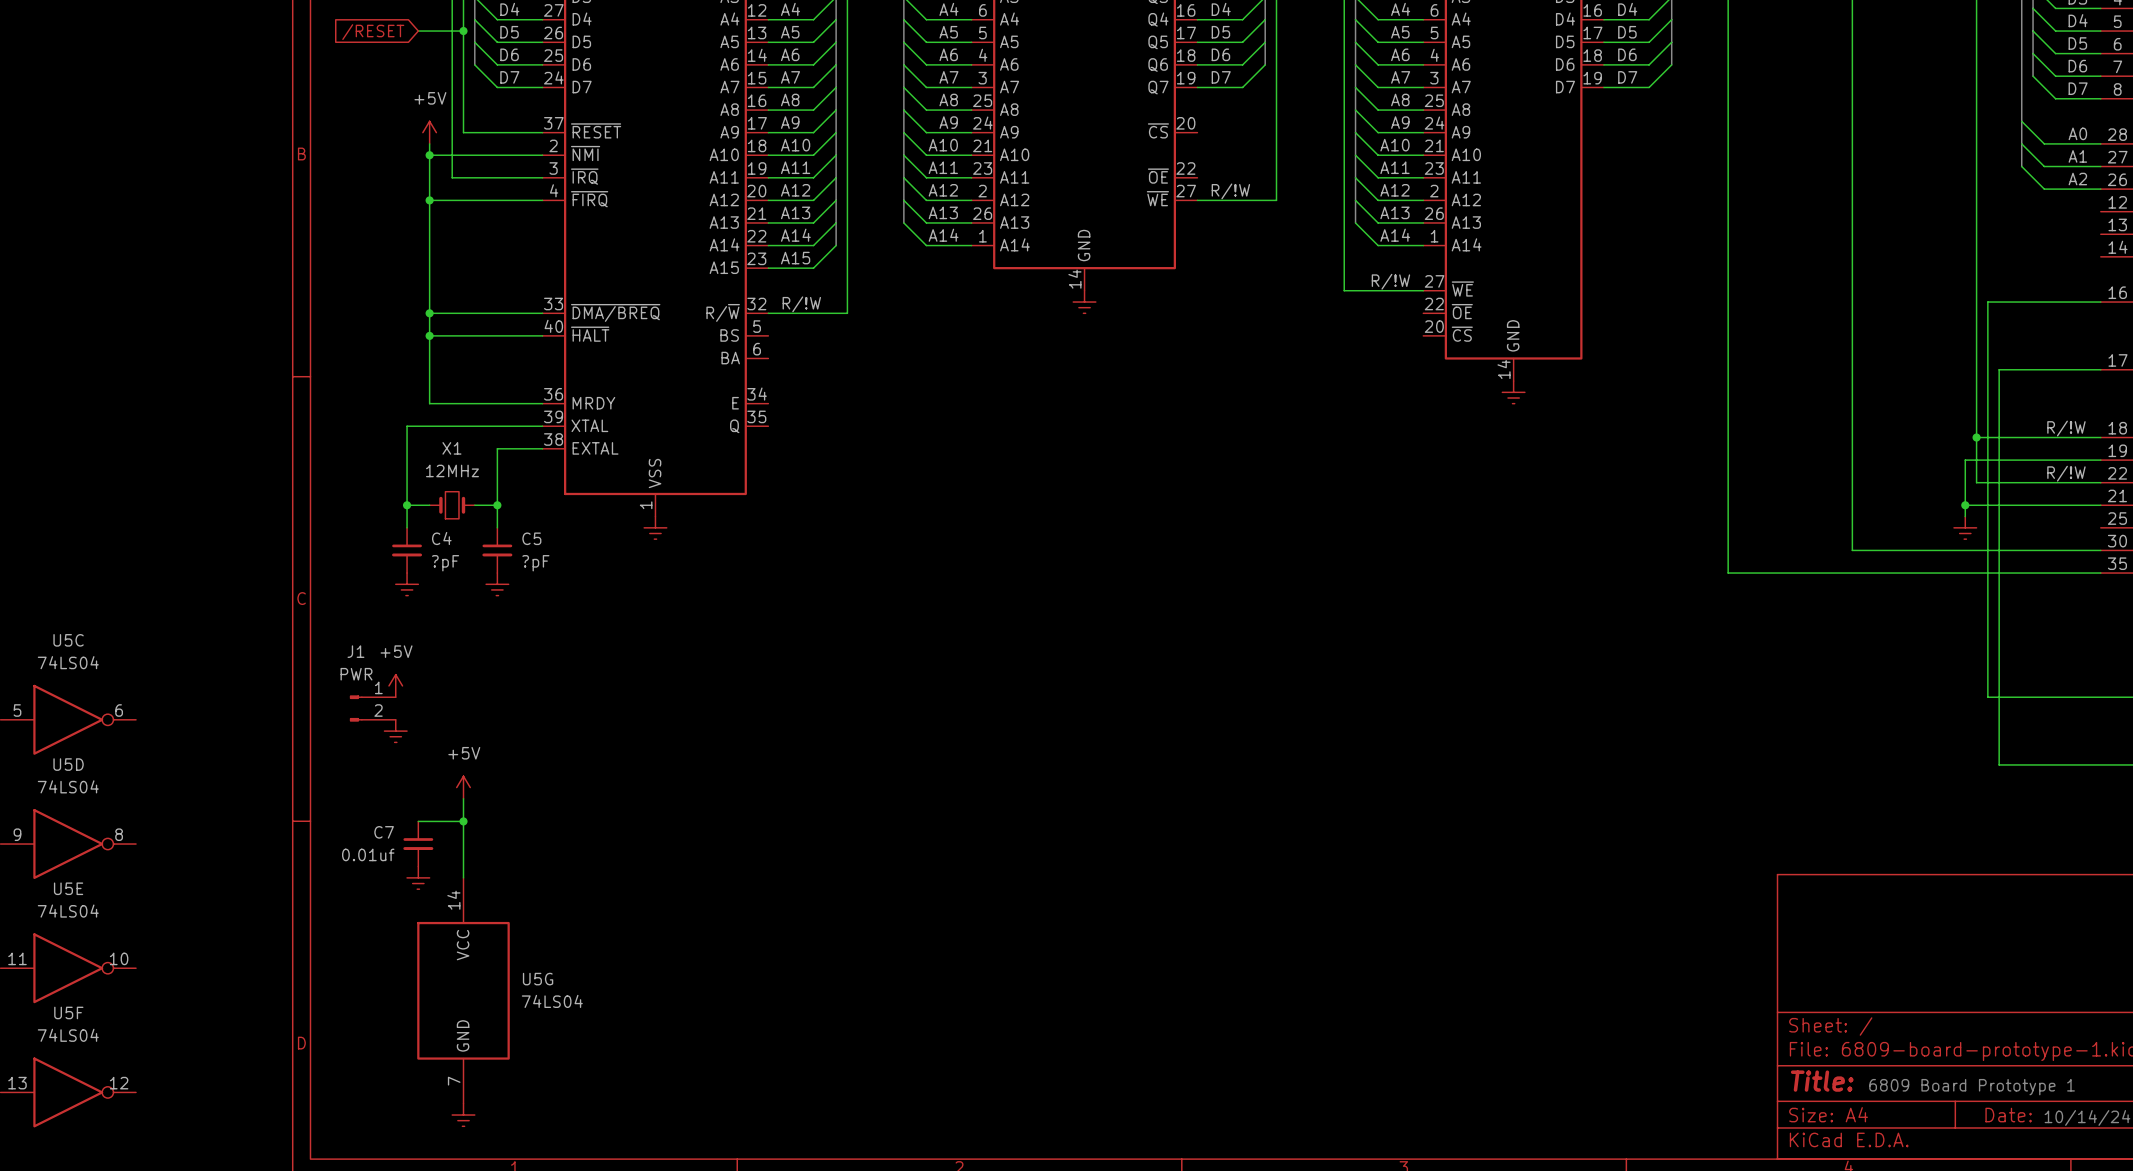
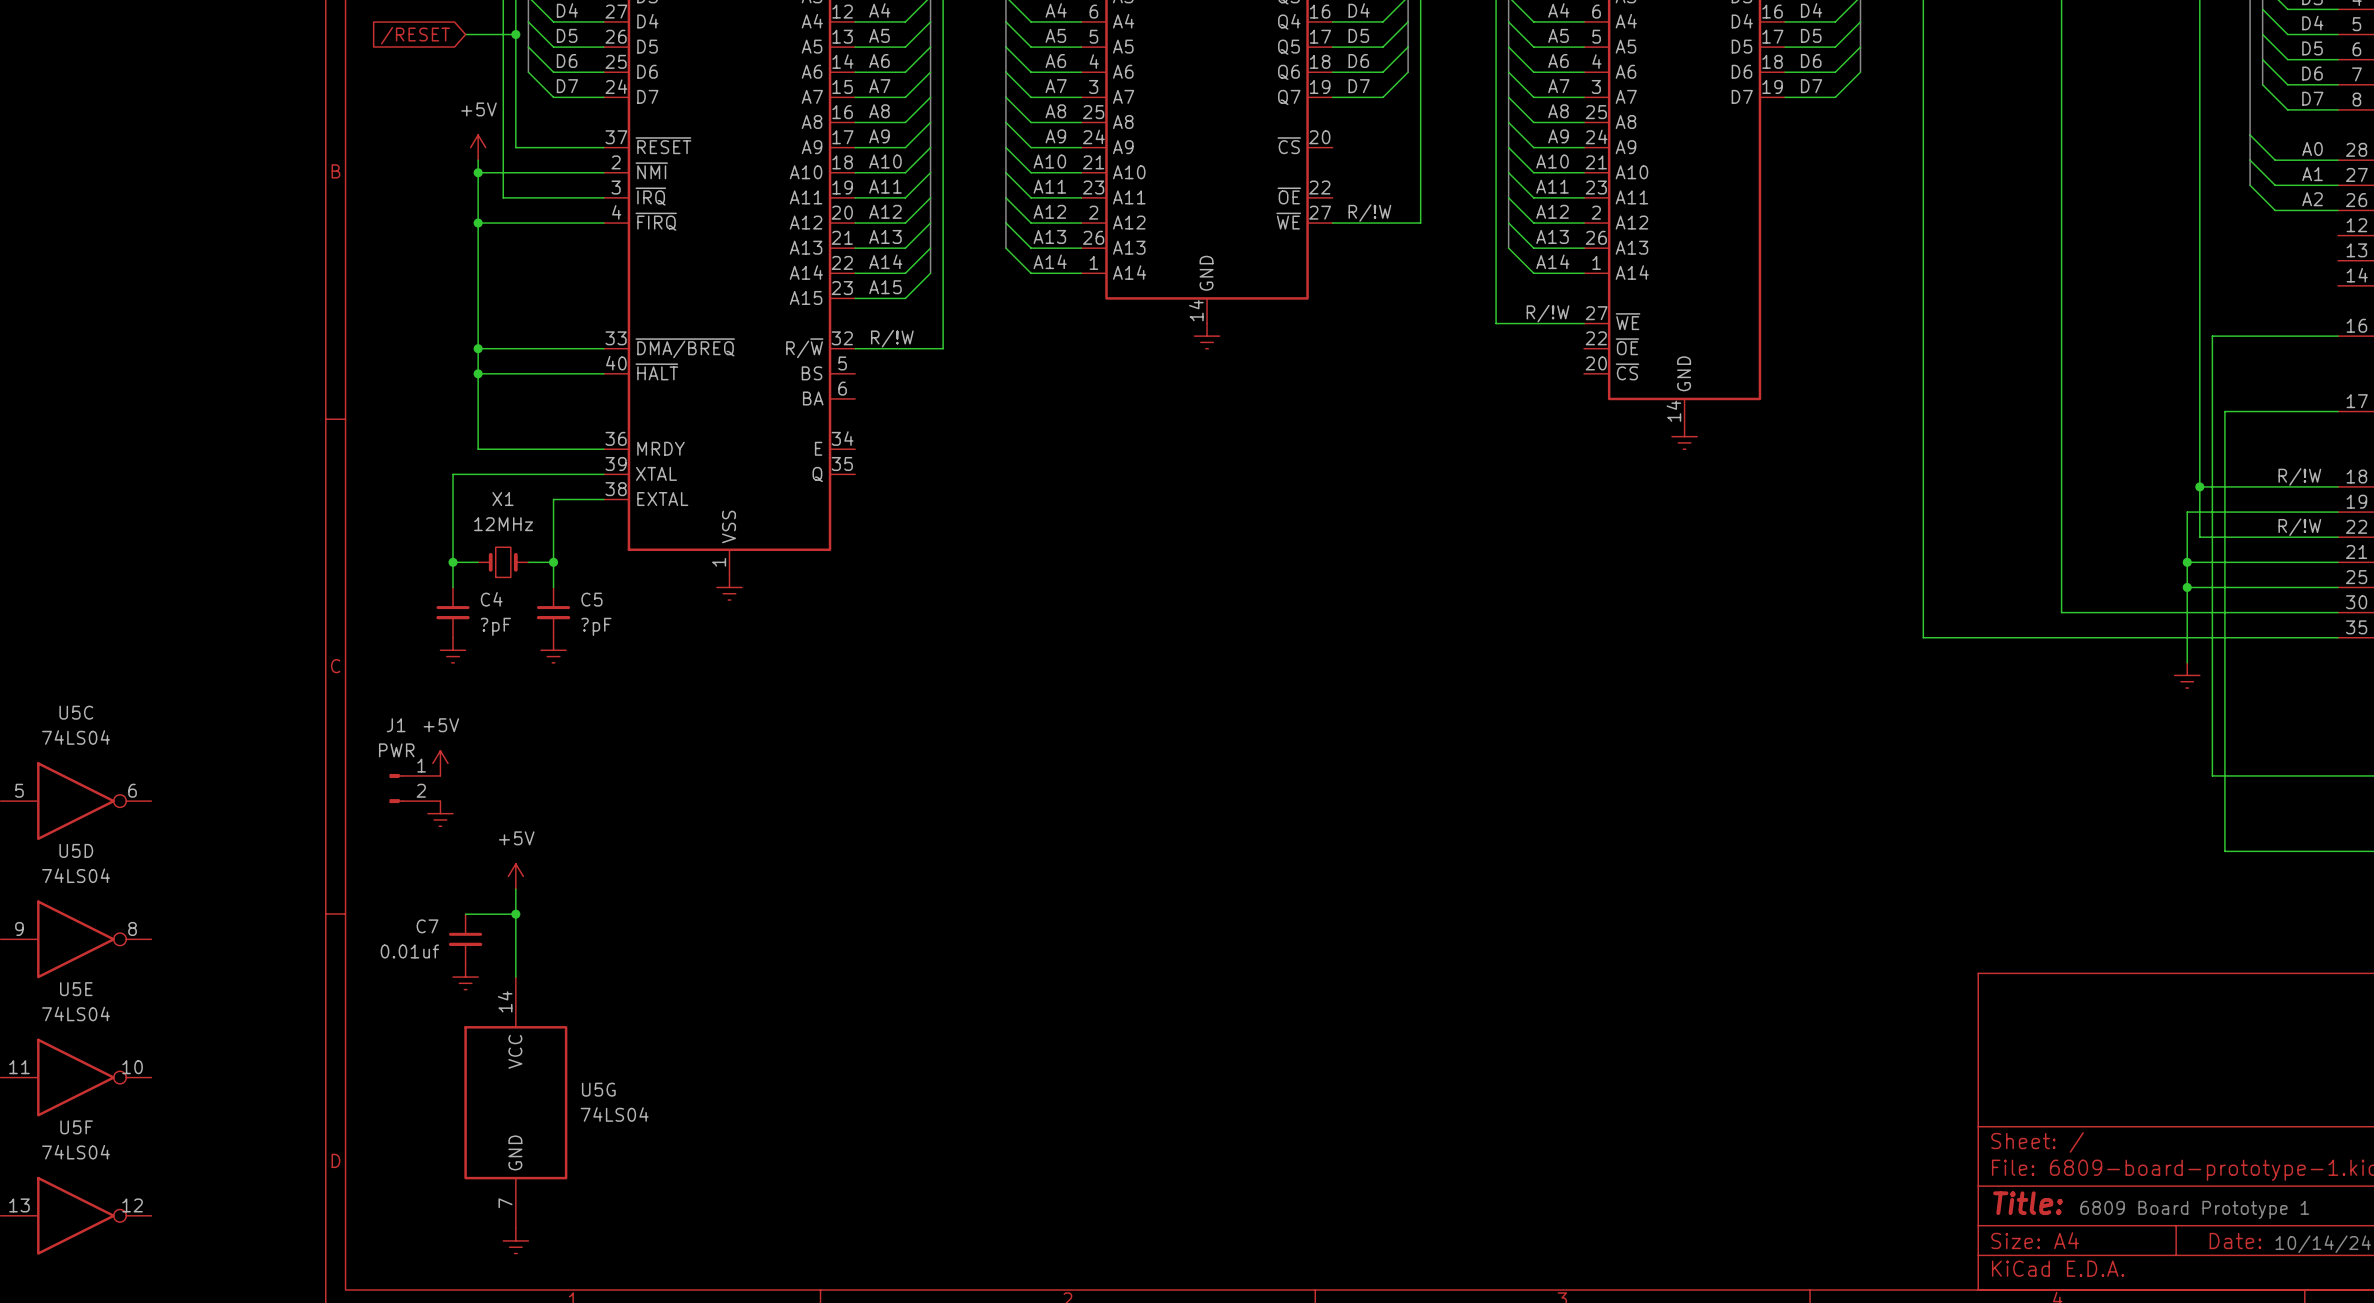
wire: none -> (2187, 574) (2187, 662)
wire: none -> (2187, 587) (2338, 587)
power symbol position: (1965, 527) -> (2187, 675)
junction: none -> (2187, 587)

